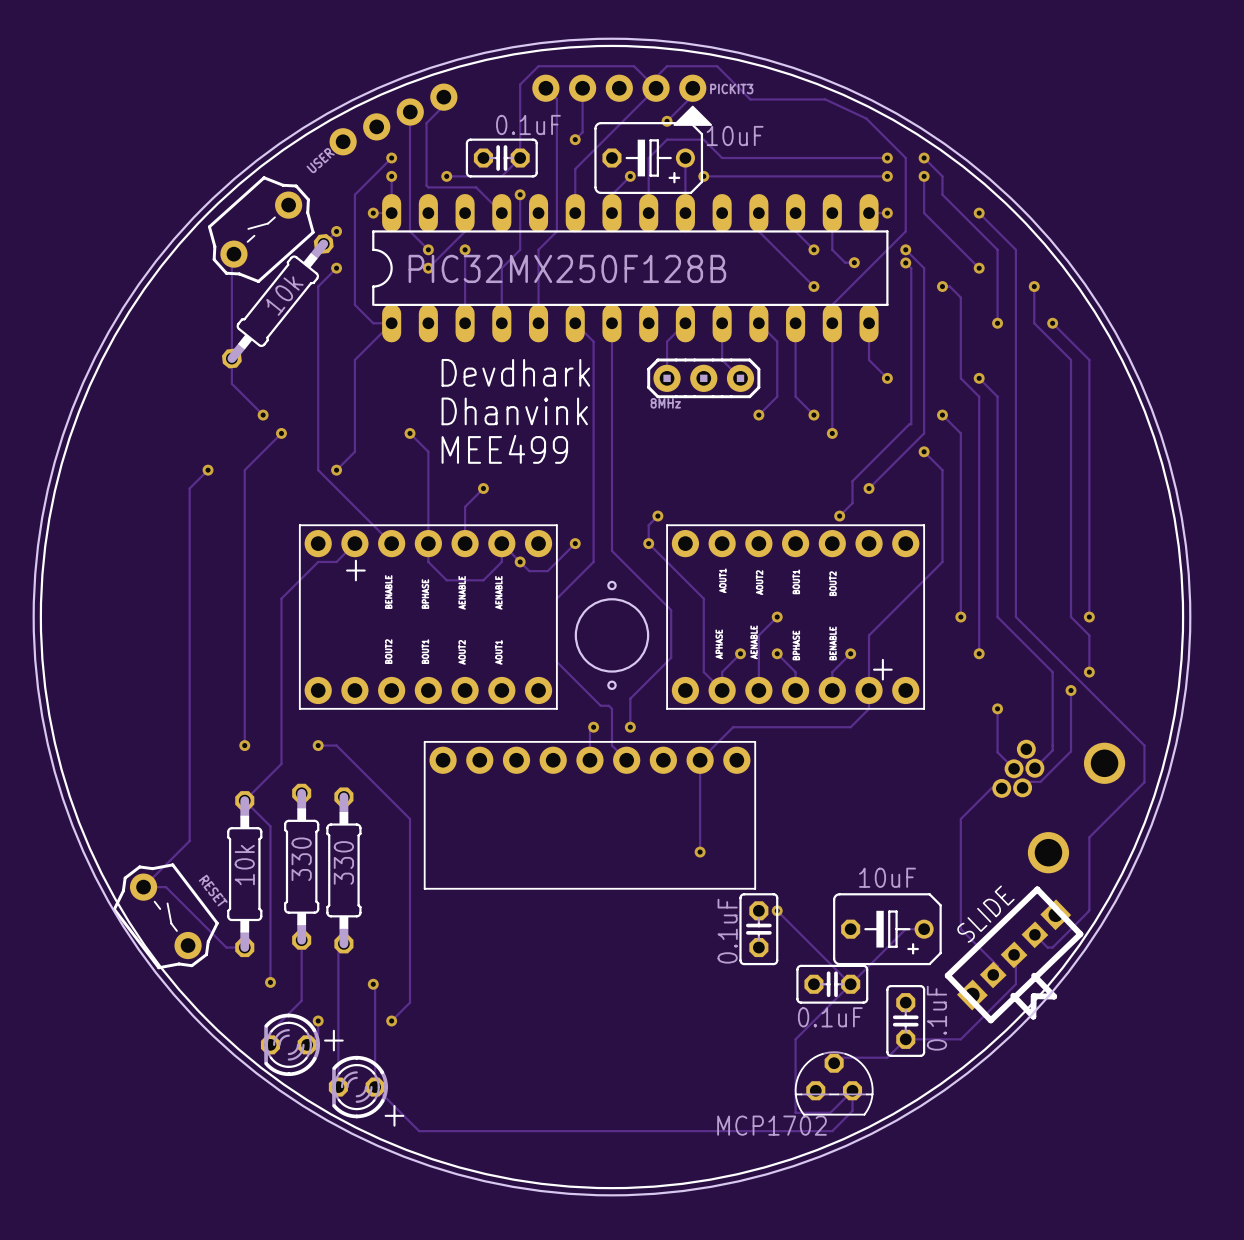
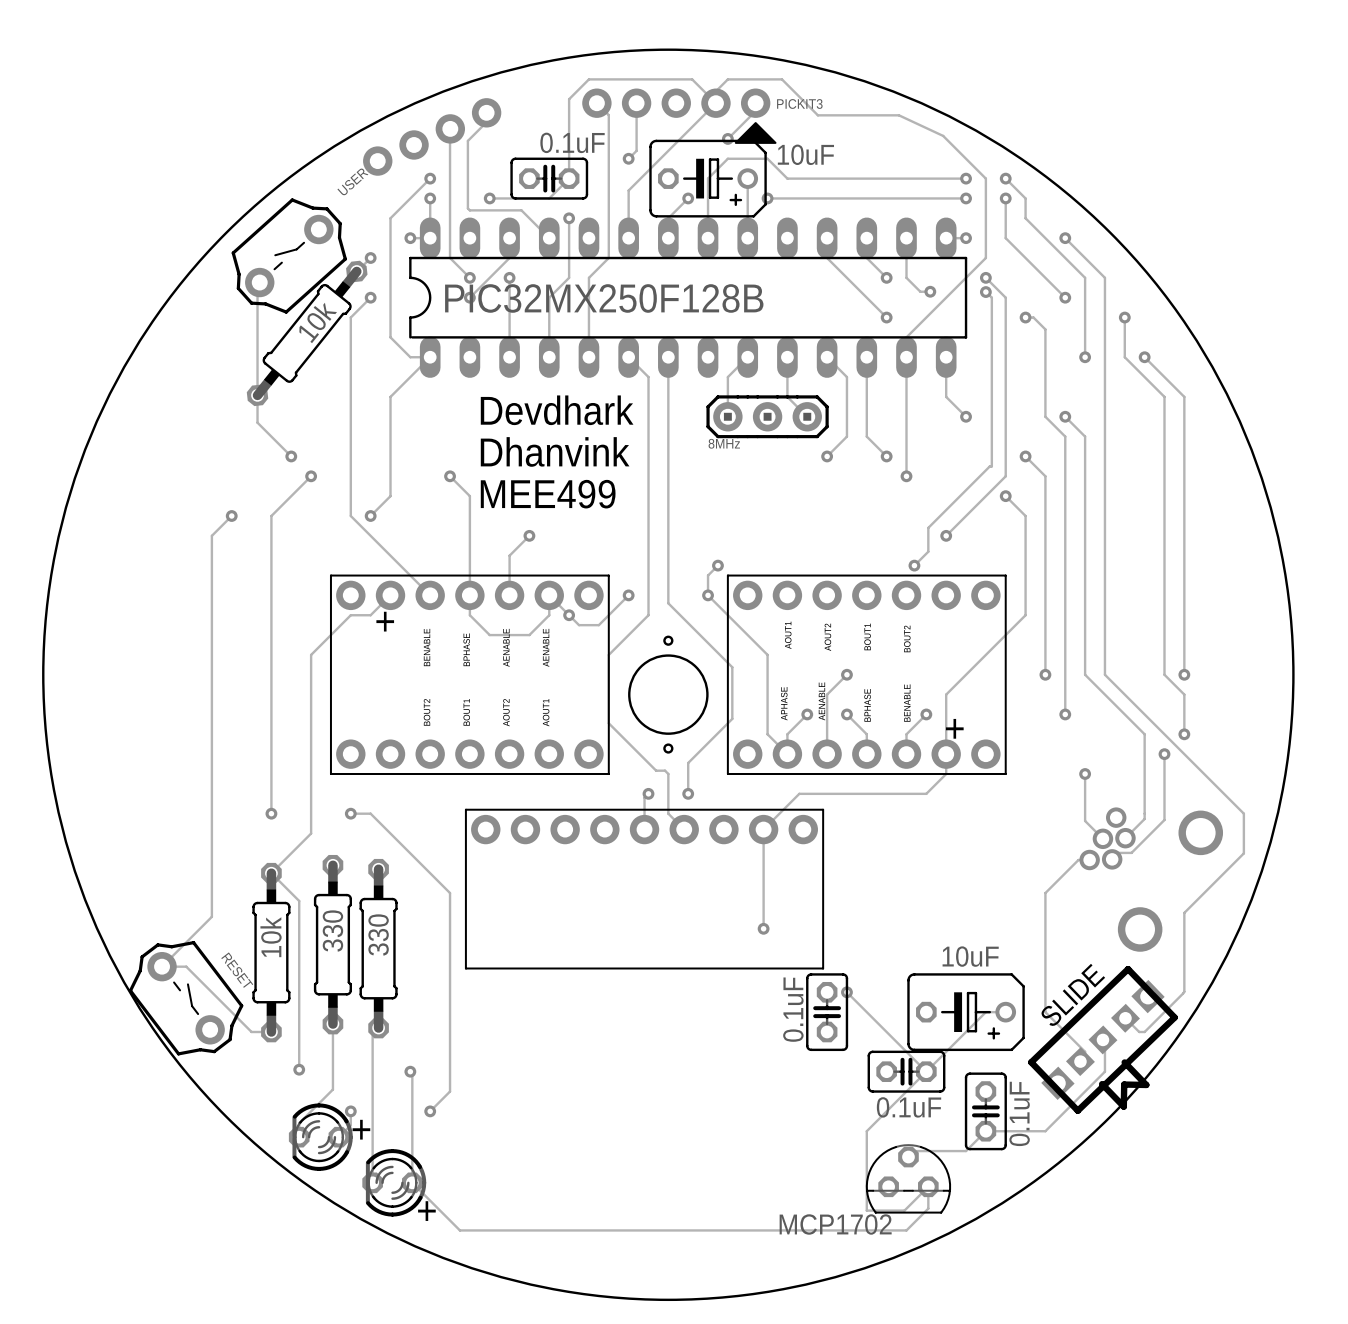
drawing: [39, 44, 1185, 1190] -> none

